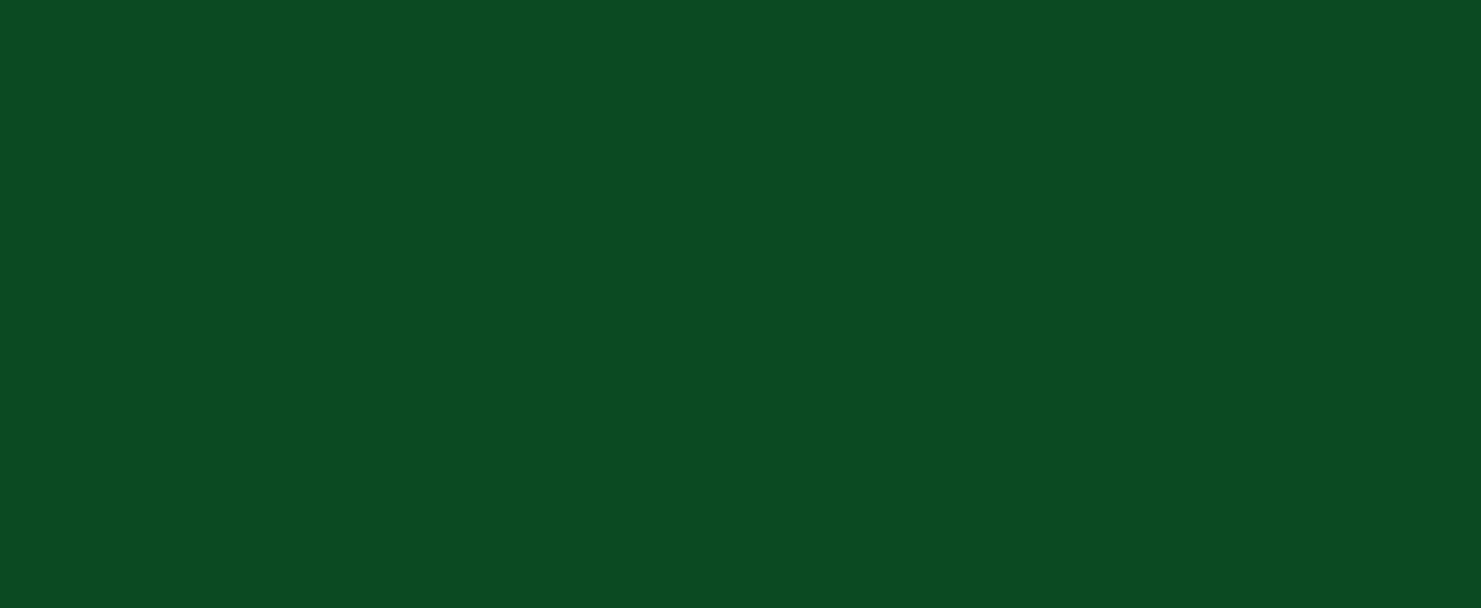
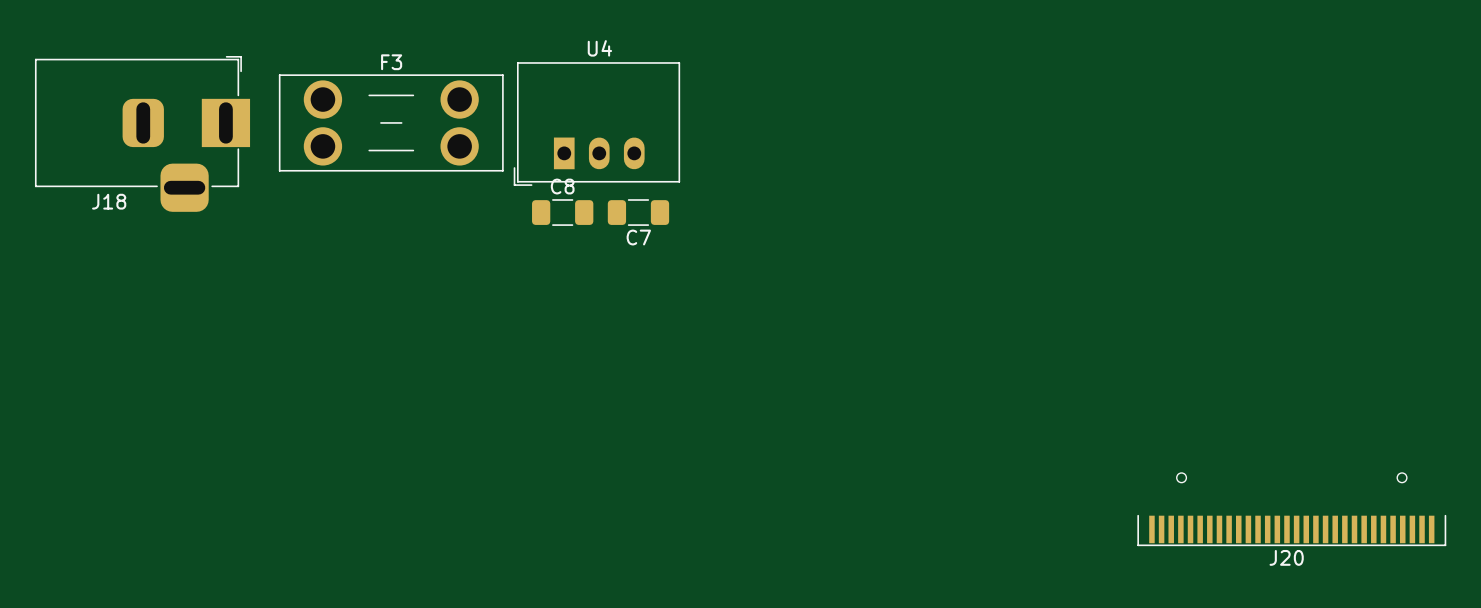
F3: none -> (391, 122)
U4: none -> (596, 124)
J18: none -> (142, 133)
C8: none -> (562, 212)
C7: none -> (638, 212)
J20: none -> (1291, 509)

